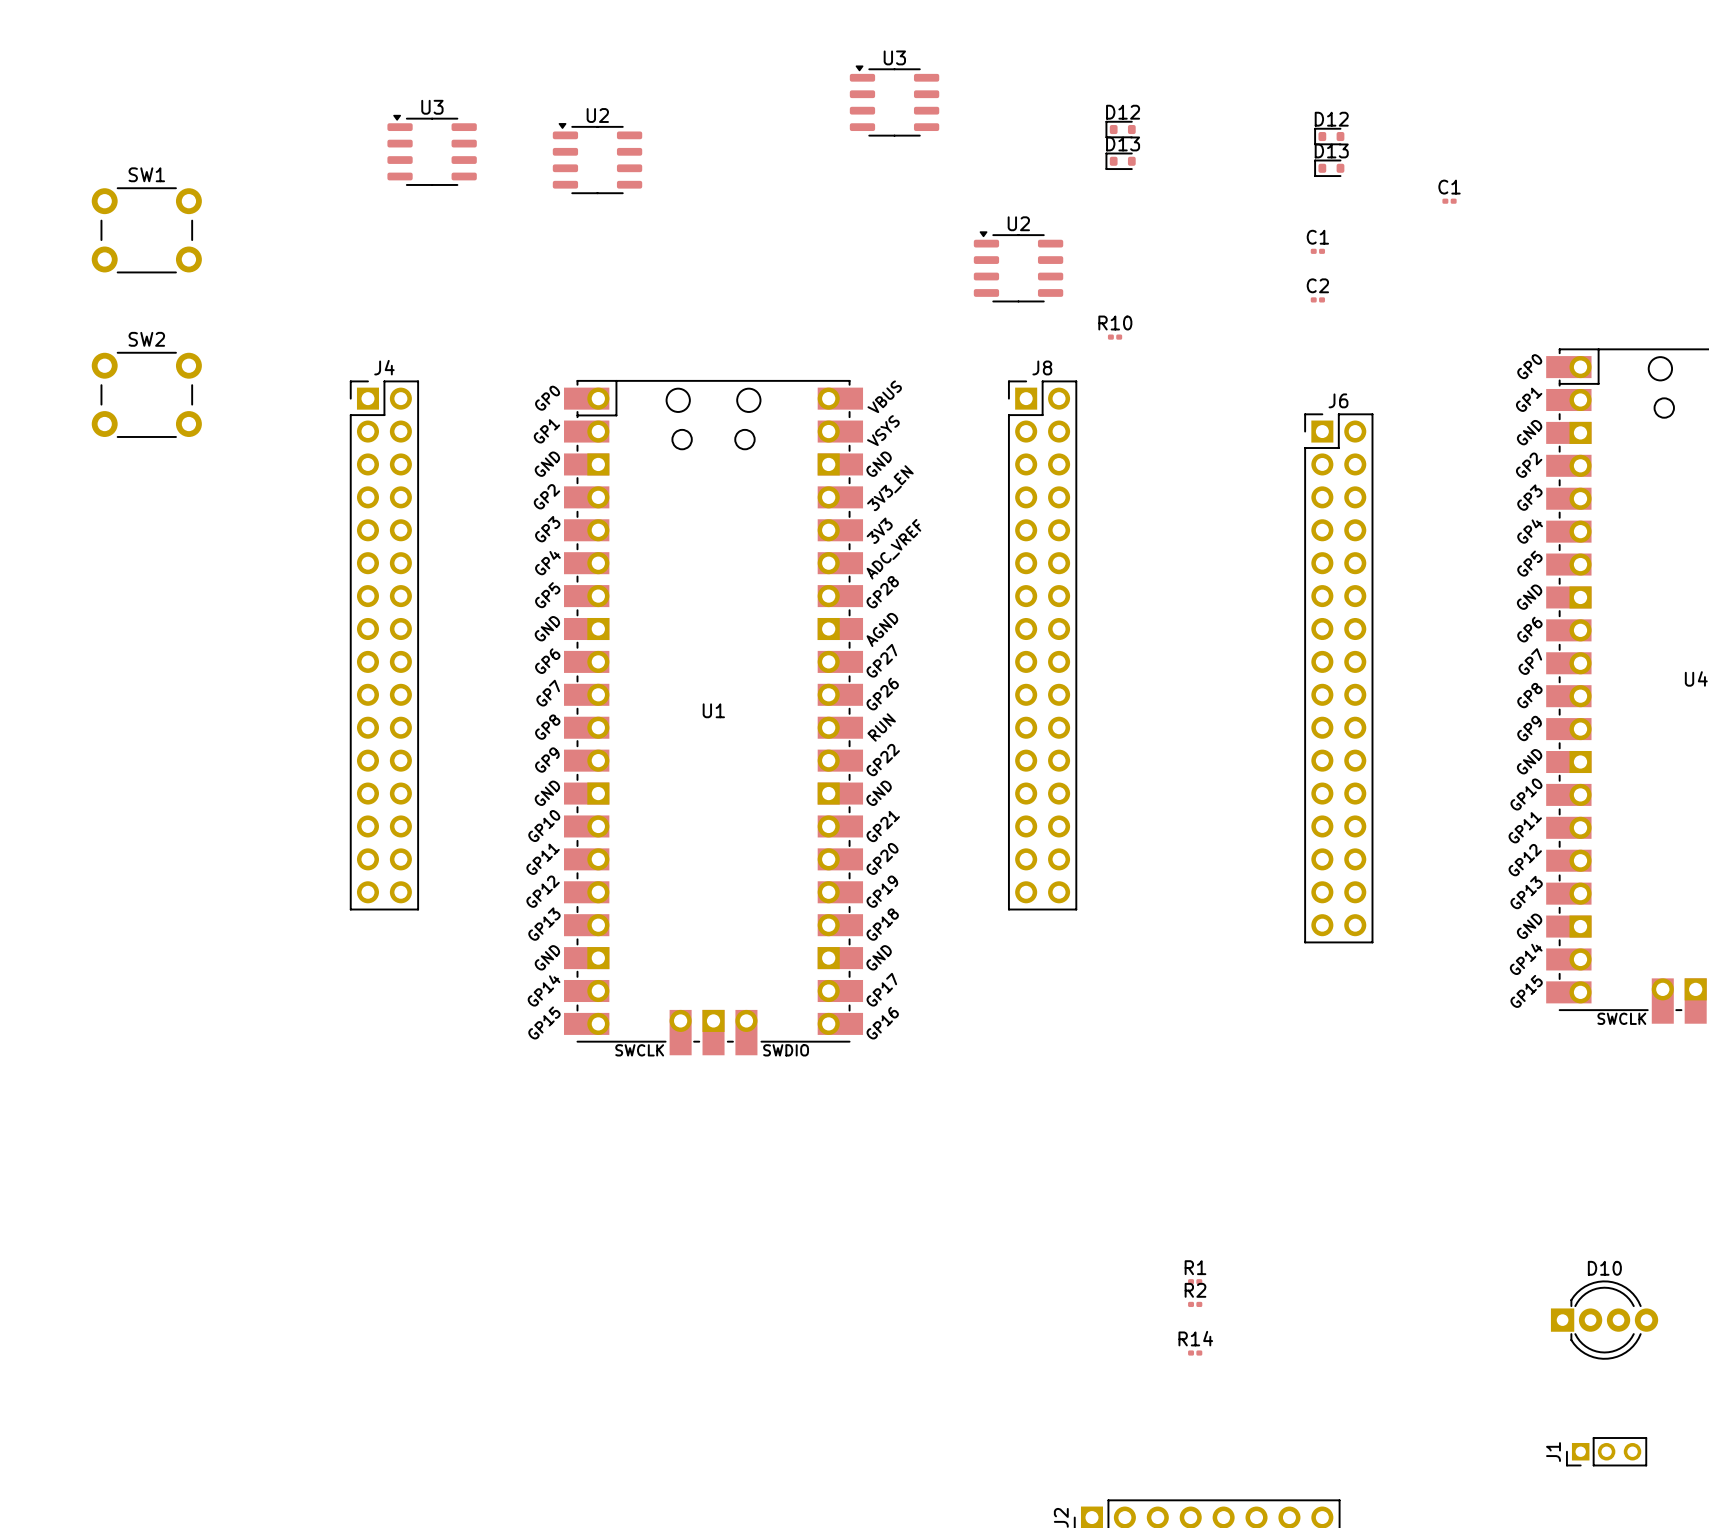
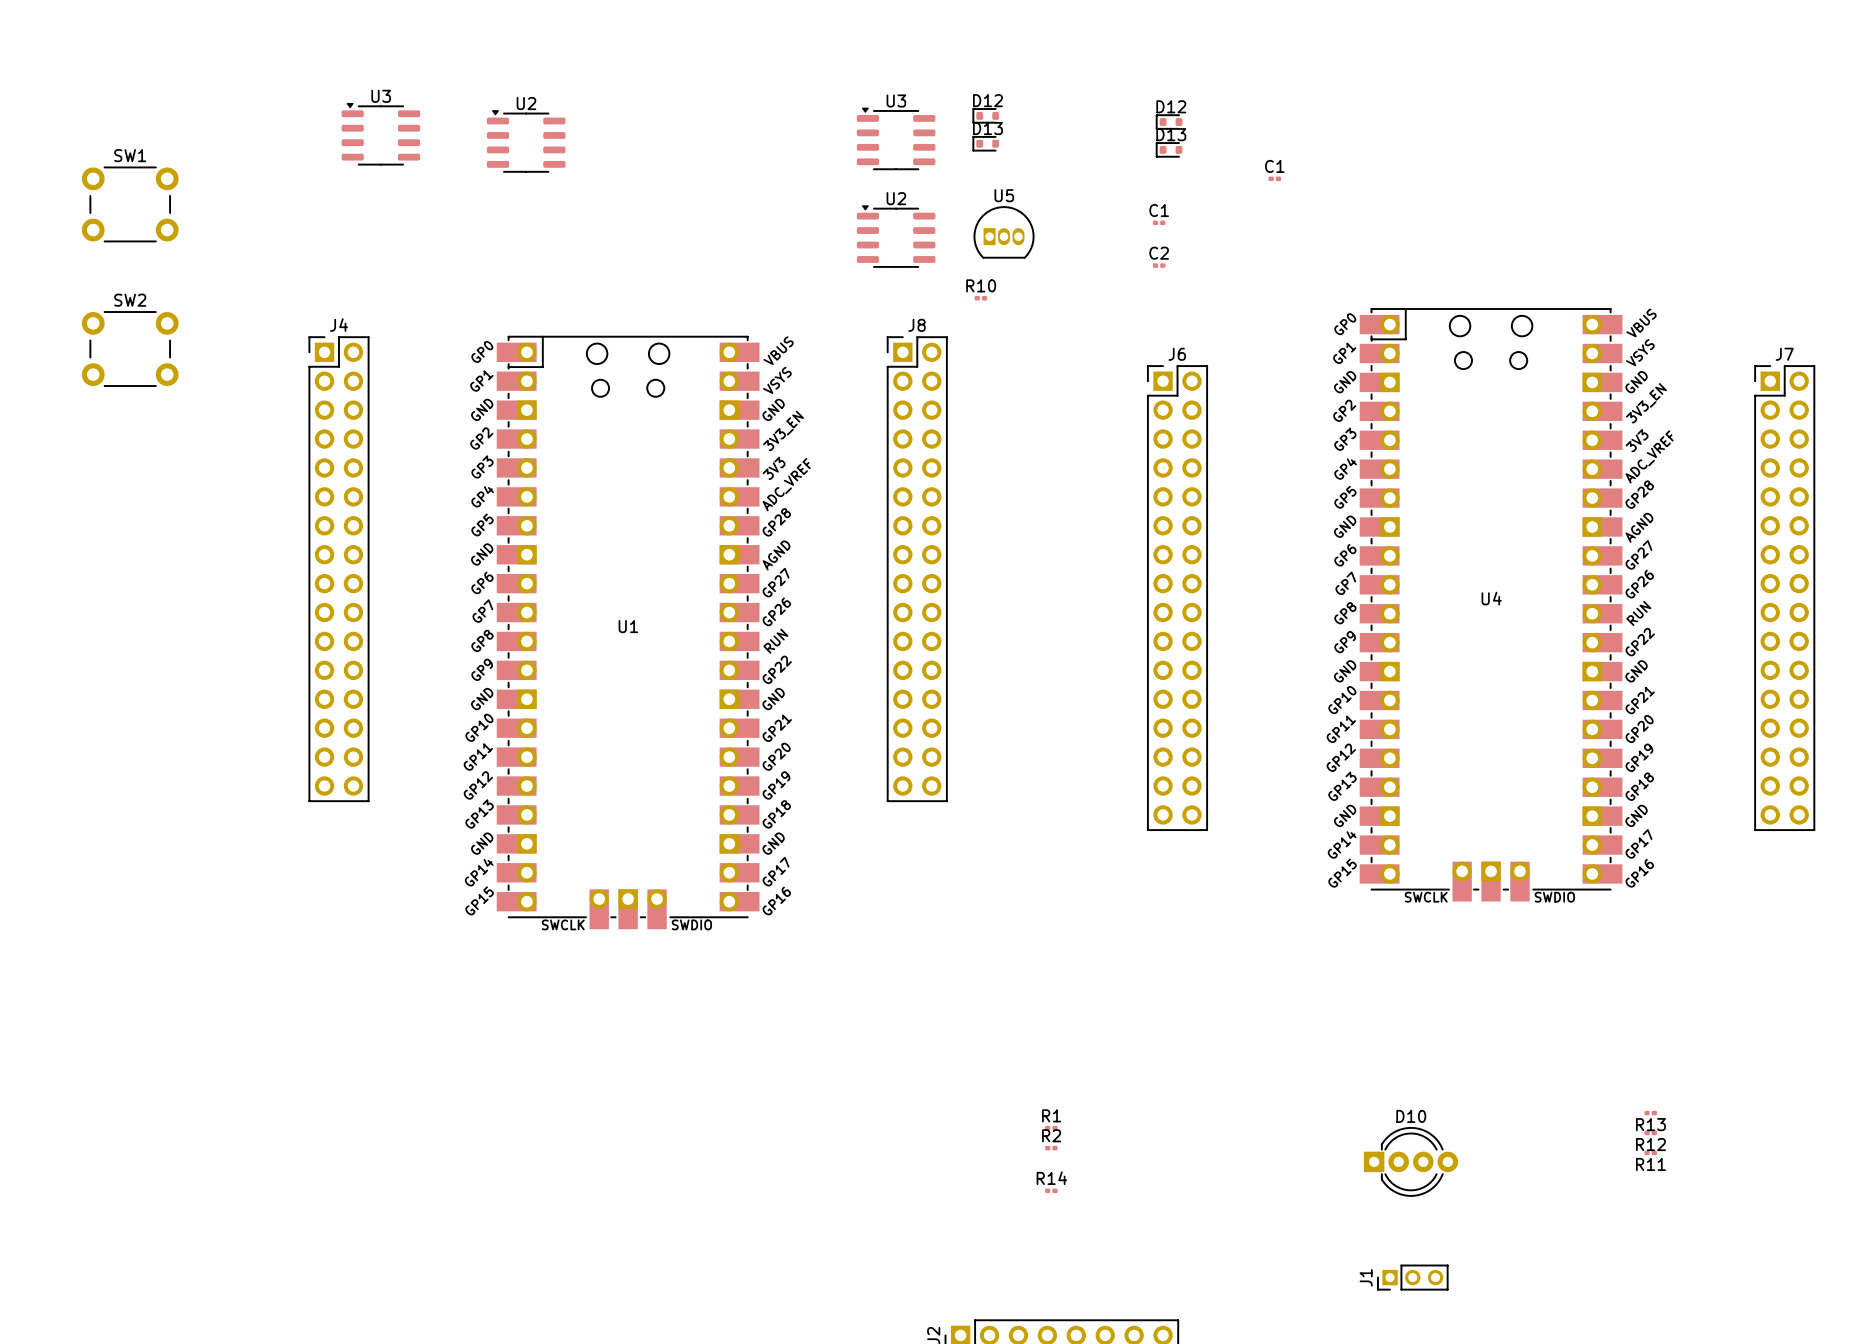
U3 position: (894, 100) -> (896, 138)
U5: none -> (1004, 232)

